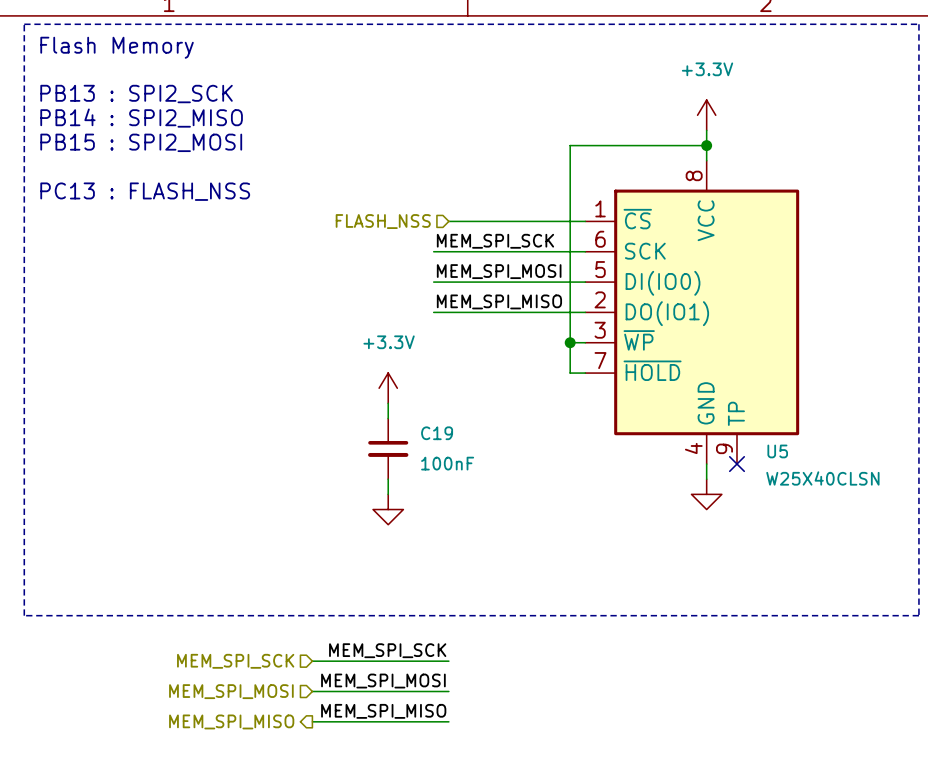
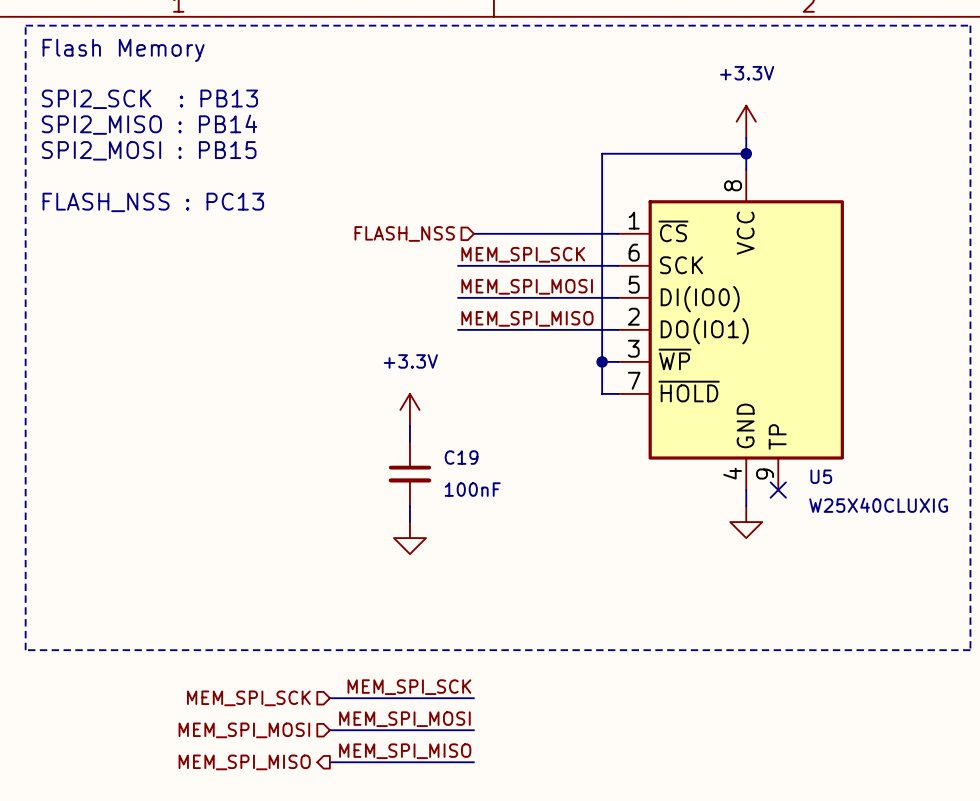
text: PB13 : SPI2_SCK (136, 94) -> SPI2_SCK : PB13 (149, 99)
text: PB14 : SPI2_MISO (141, 118) -> SPI2_MISO : PB14 (149, 124)
text: PB15 : SPI2_MOSI (141, 142) -> SPI2_MOSI : PB15 (149, 150)
text: PC13 : FLASH_NSS (145, 191) -> FLASH_NSS : PC13 (153, 202)
U5 value: W25X40CLSN (822, 478) -> W25X40CLUXIG (878, 505)

